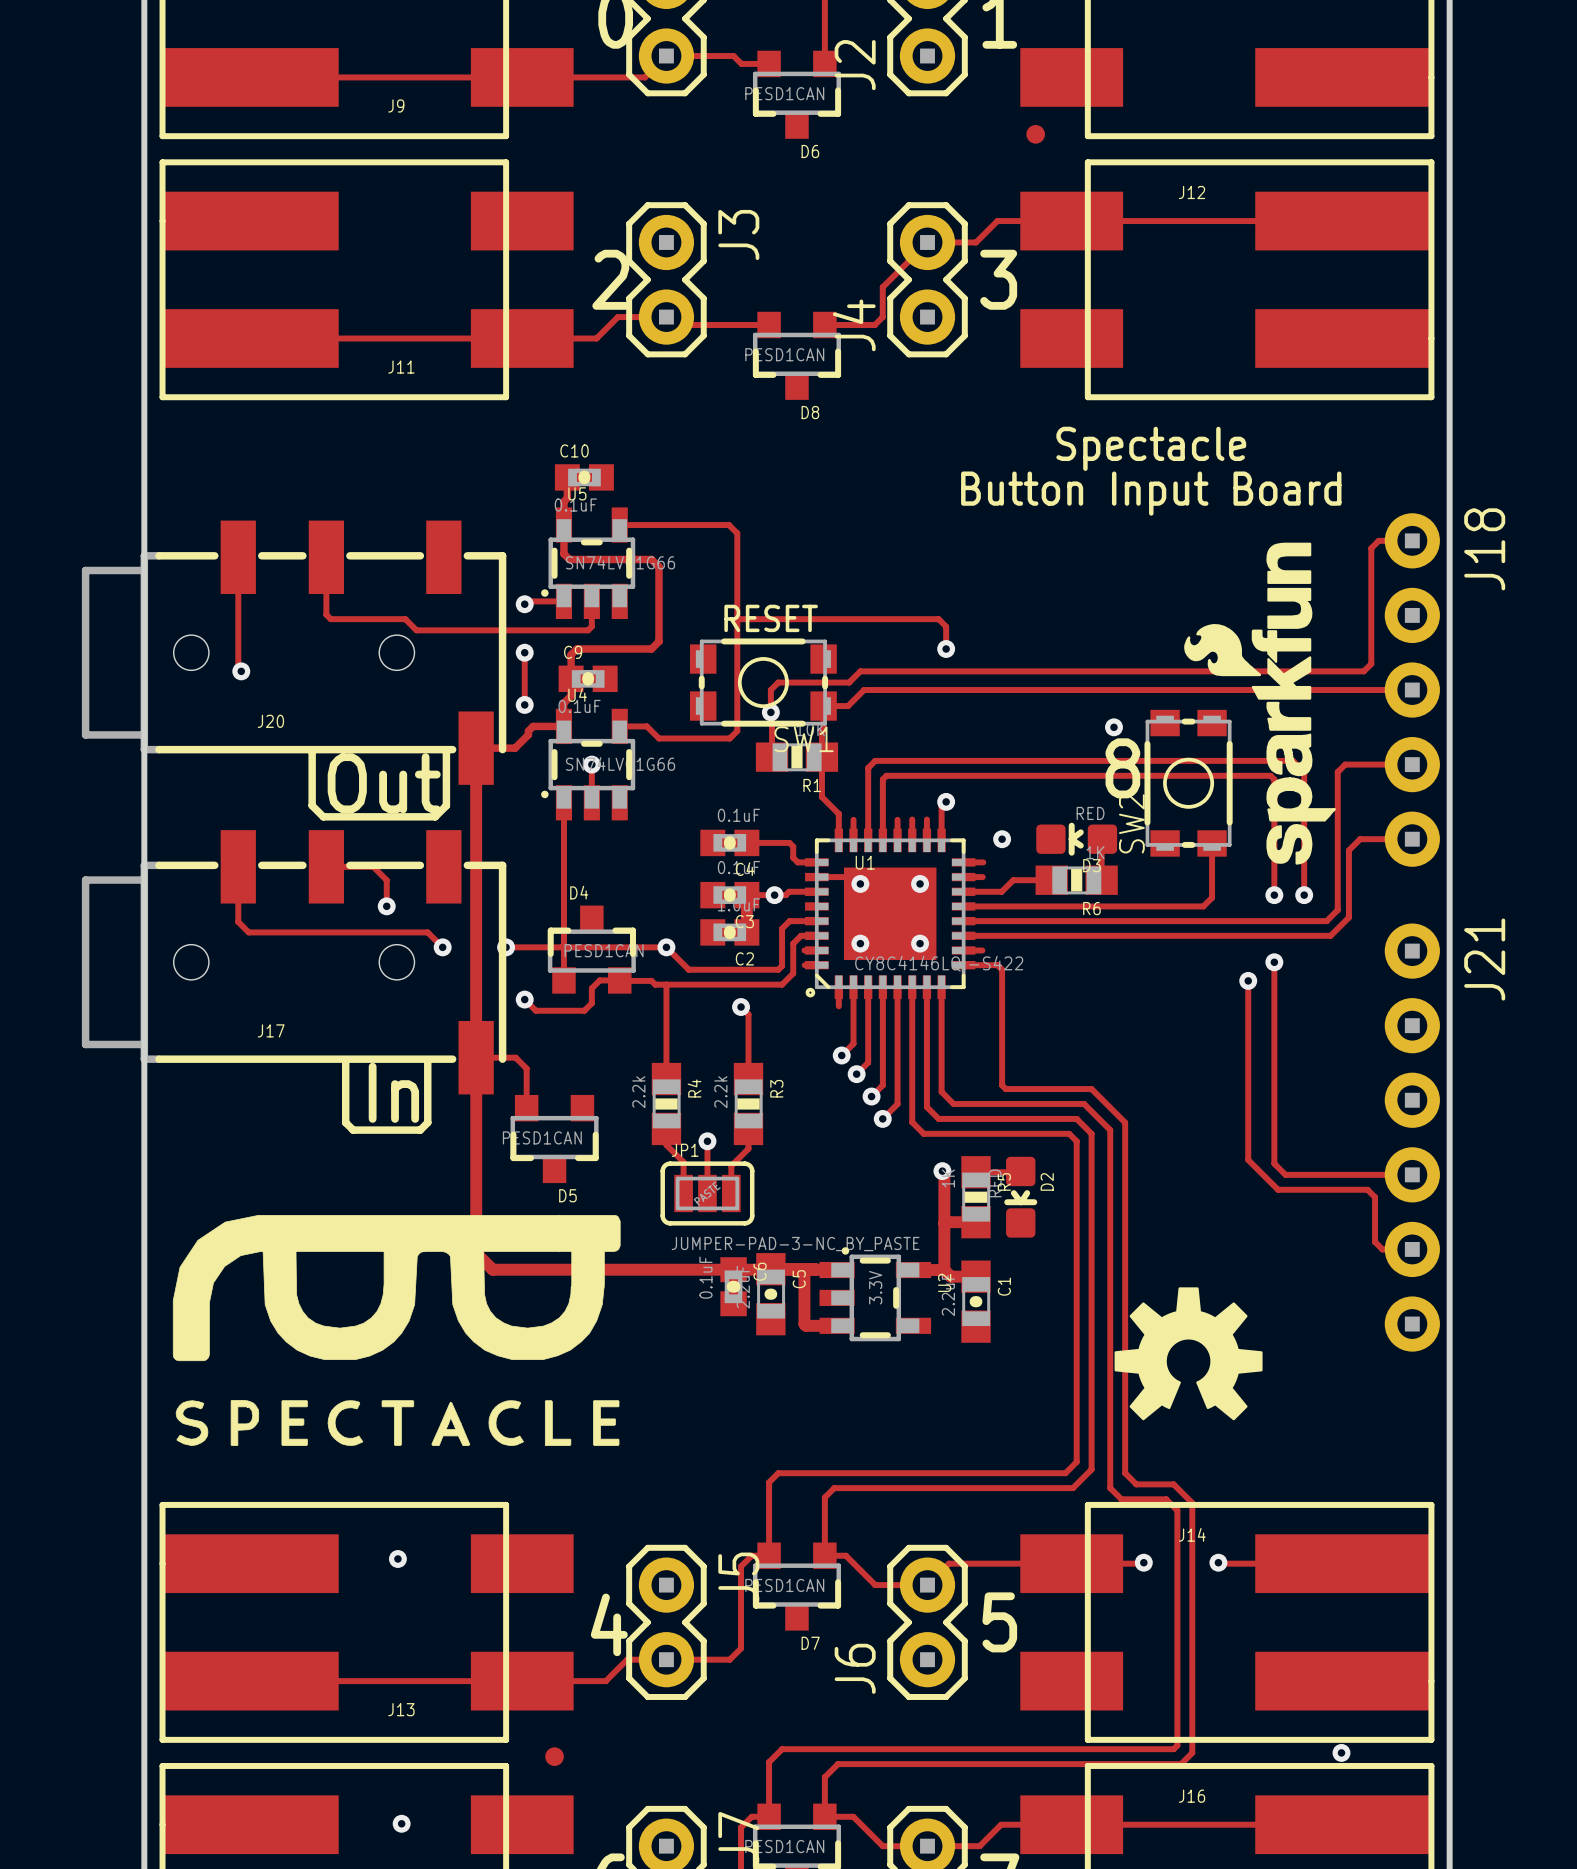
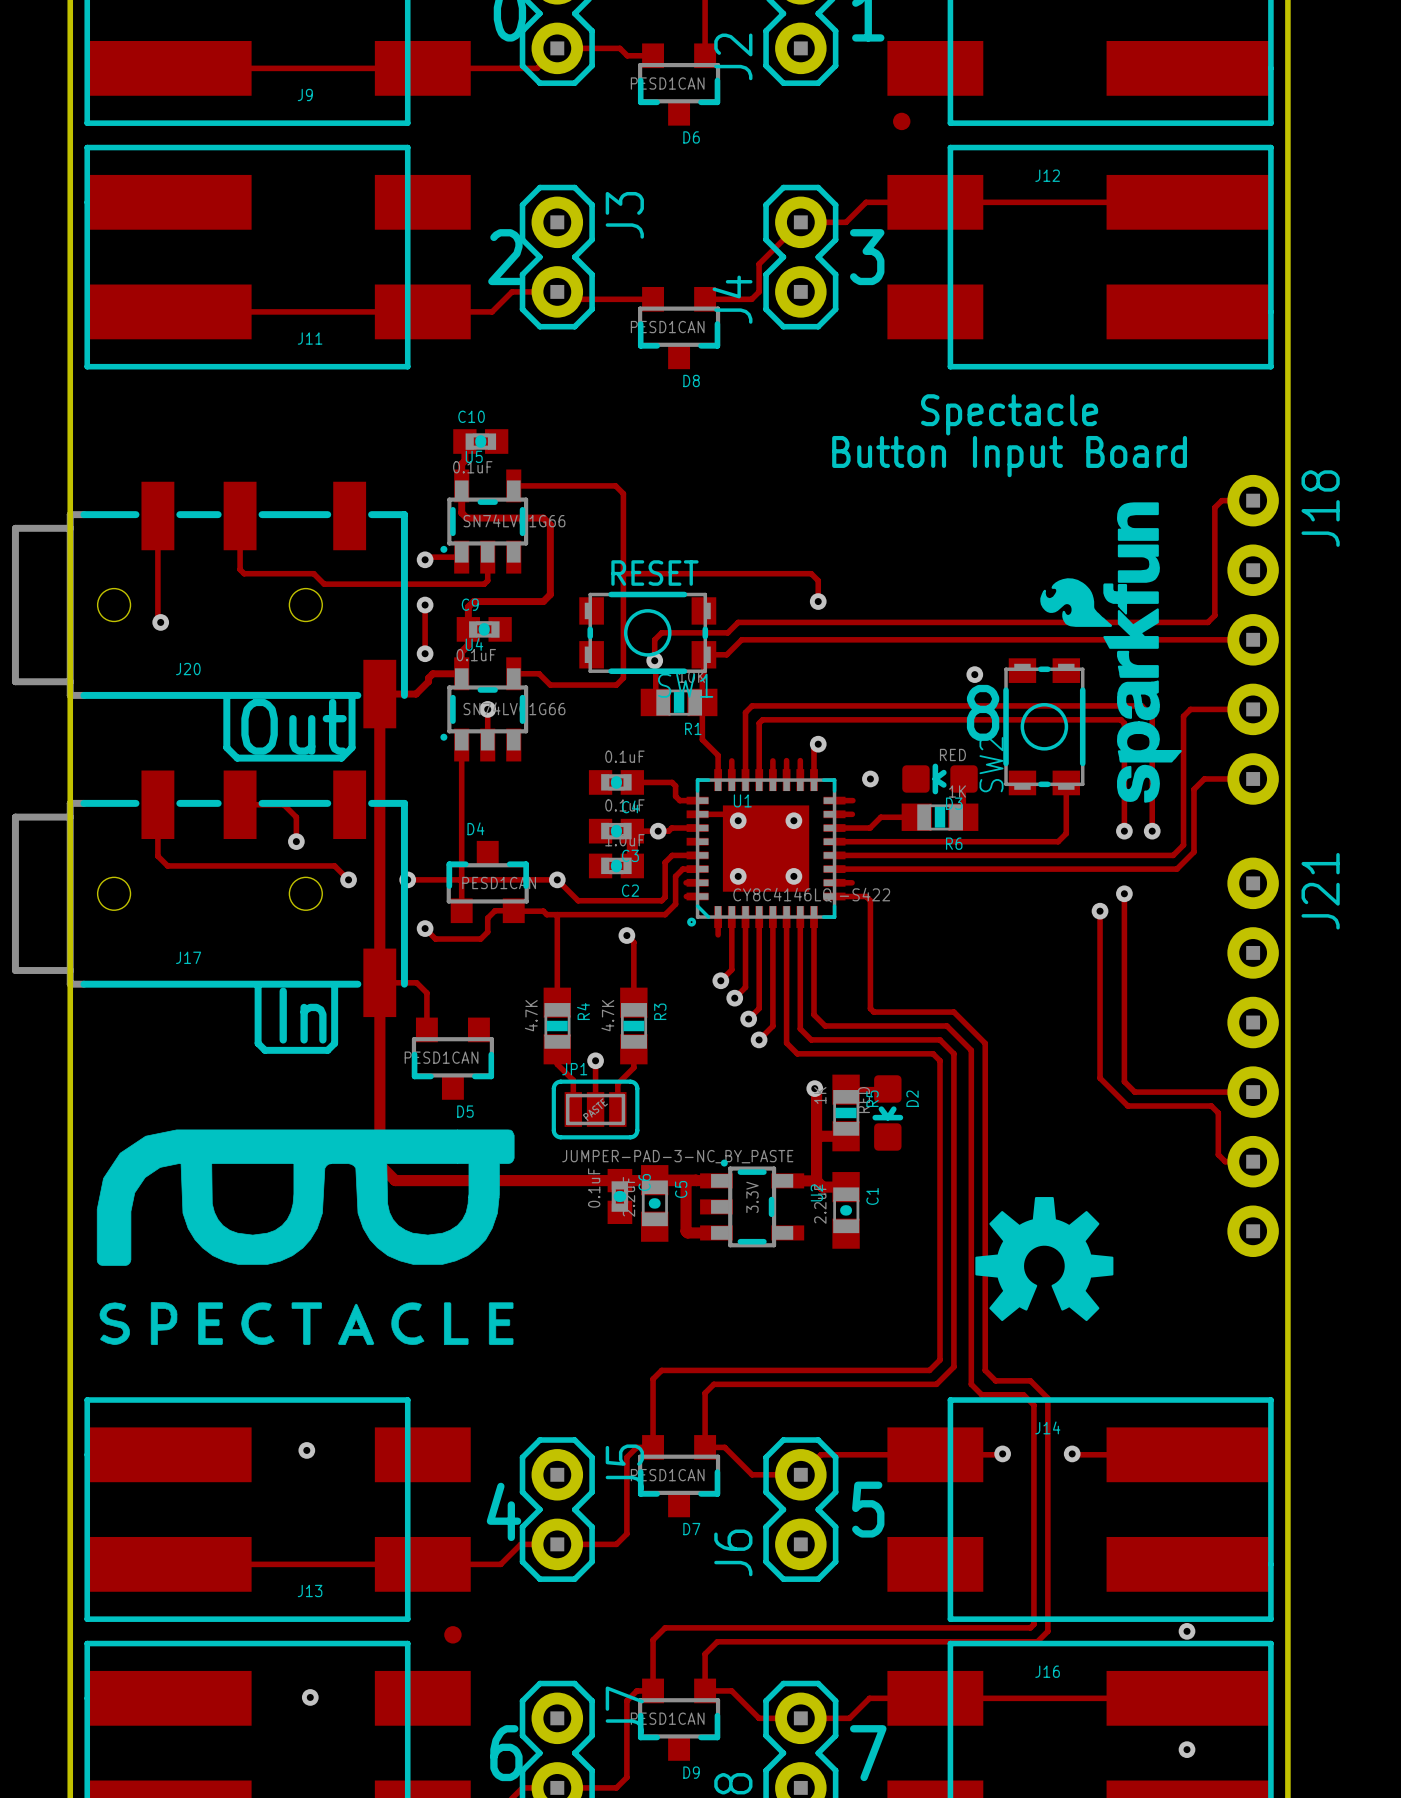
R4 value: 2.2k (638, 1092) -> 4.7K (531, 1015)
R3 value: 2.2k (720, 1092) -> 4.7K (607, 1015)

